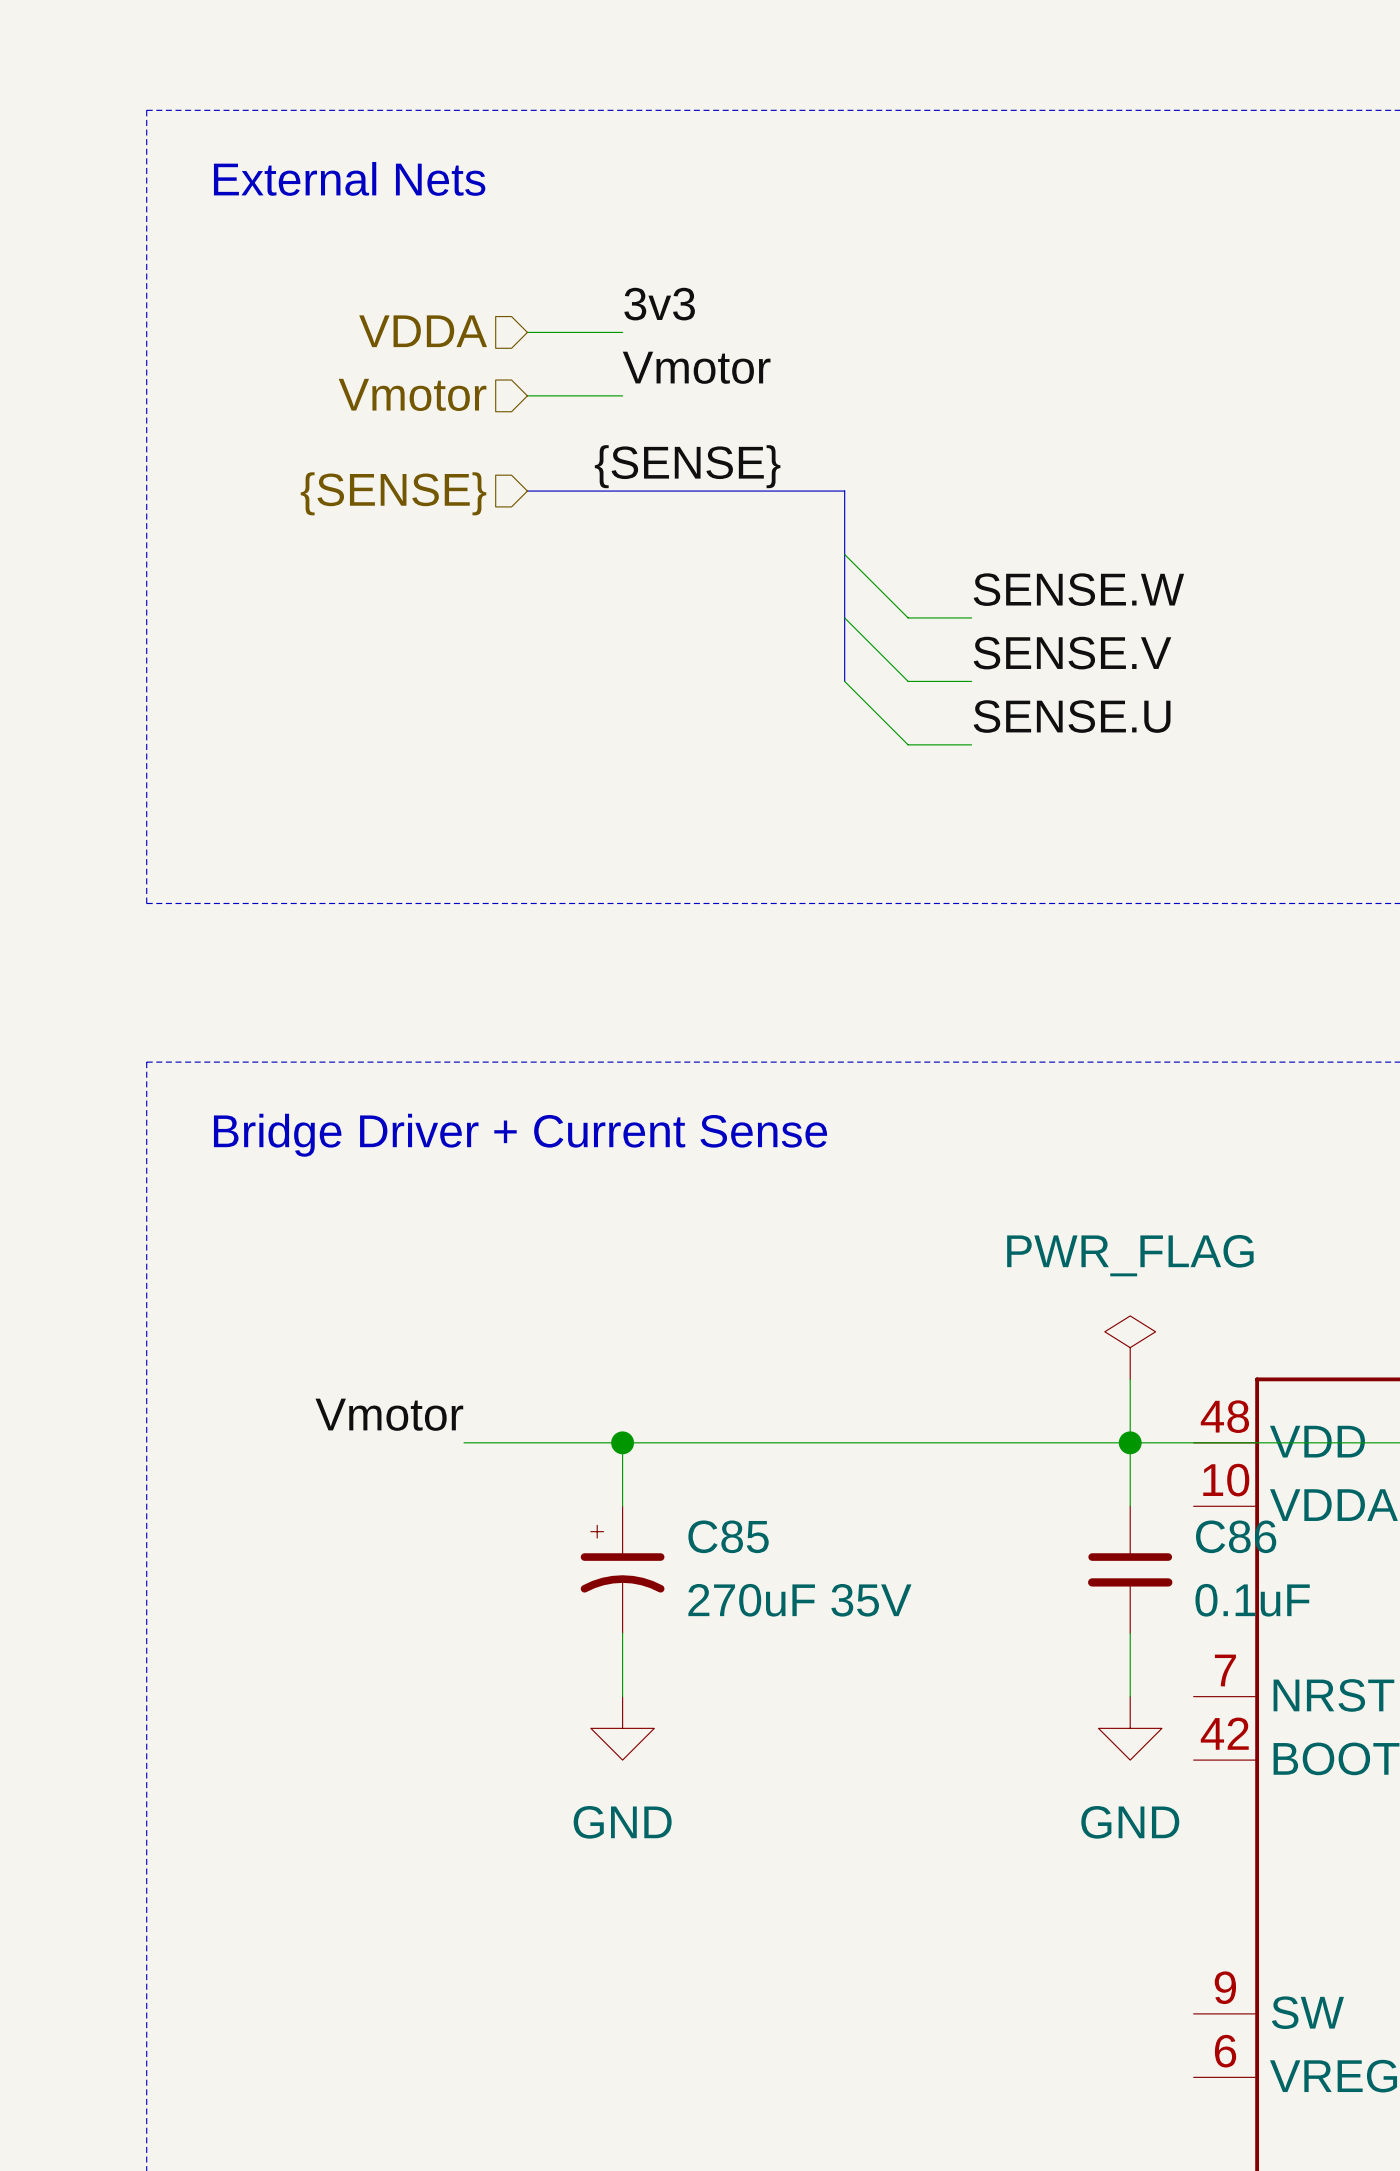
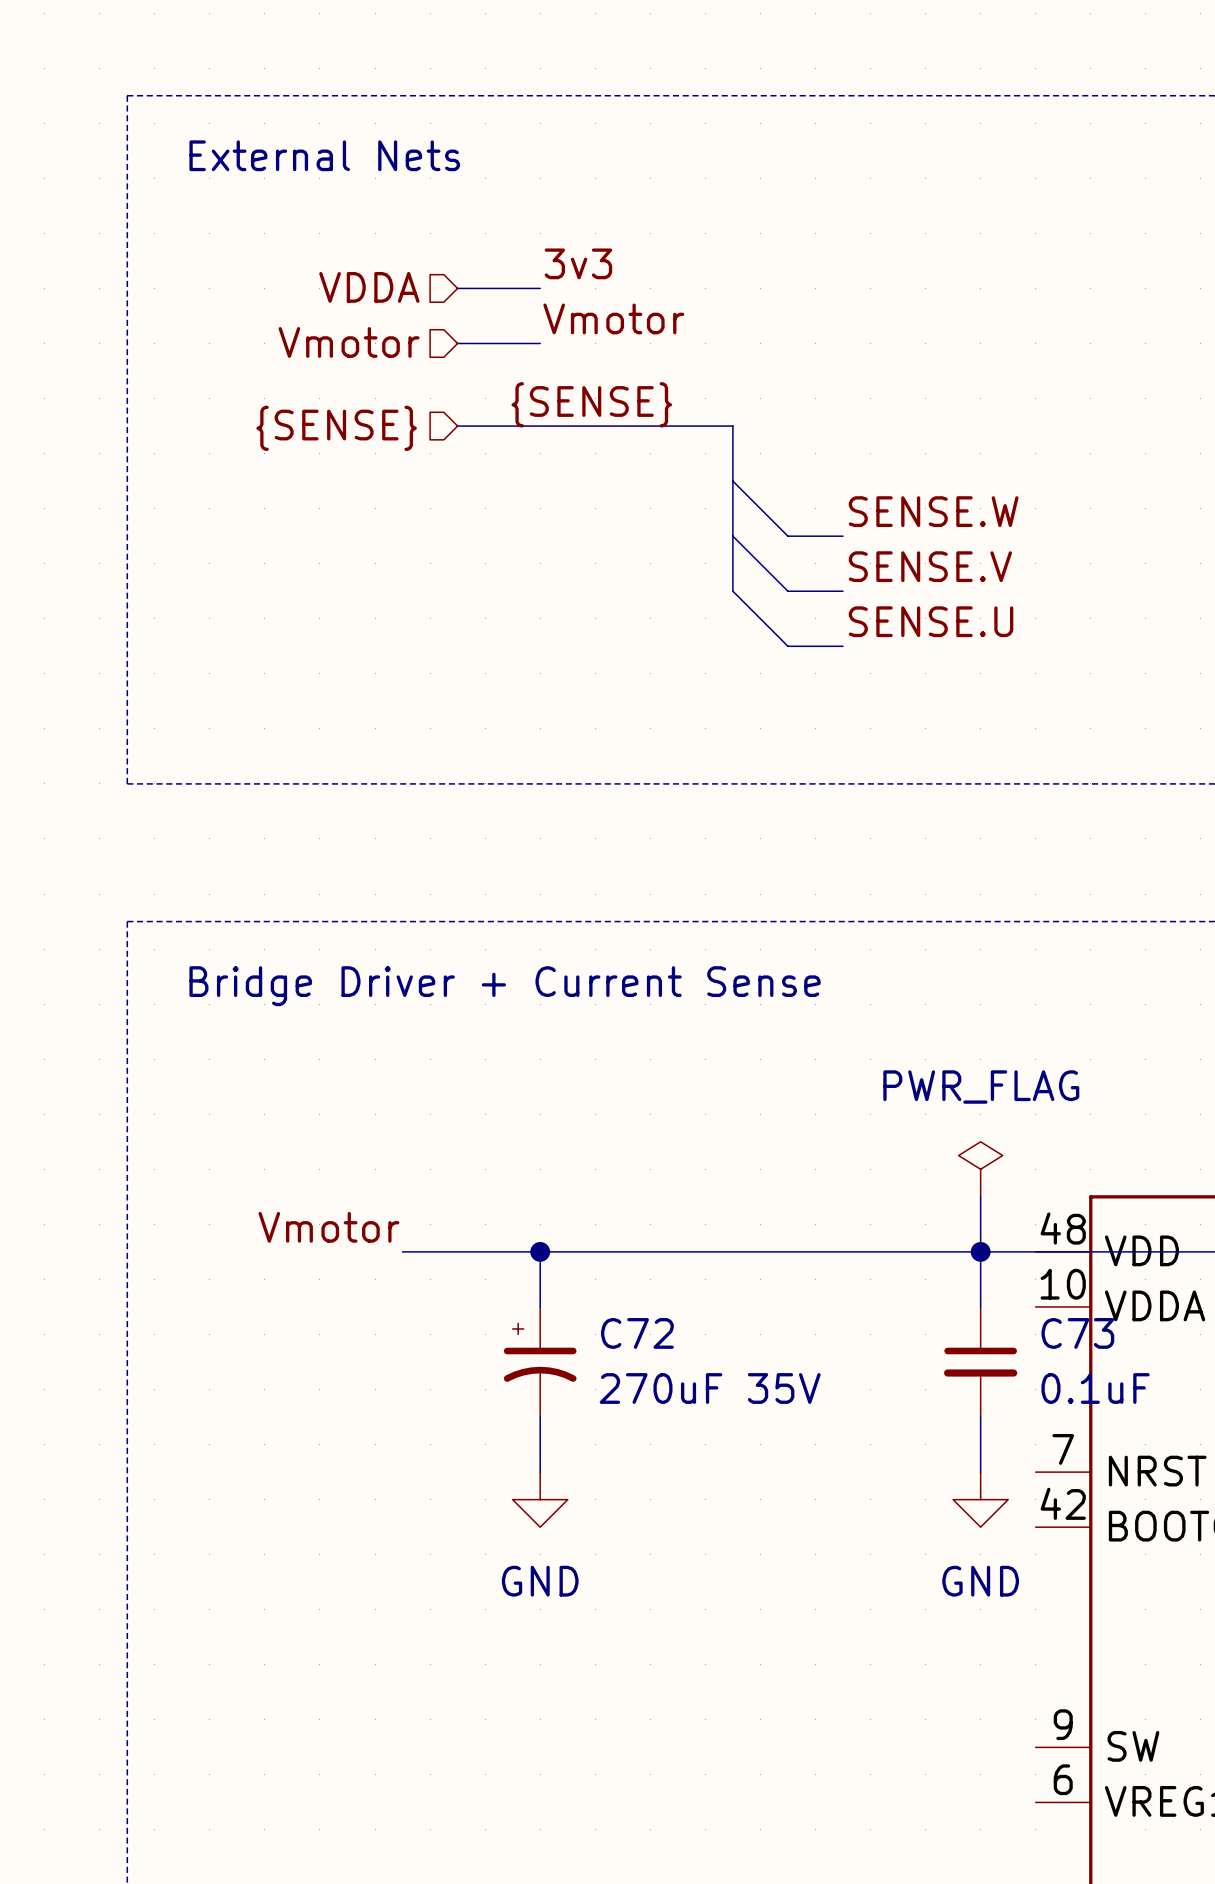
C85 name: C85 (728, 1536) -> C72 (637, 1333)
C86 name: C86 (1236, 1536) -> C73 (1077, 1333)

